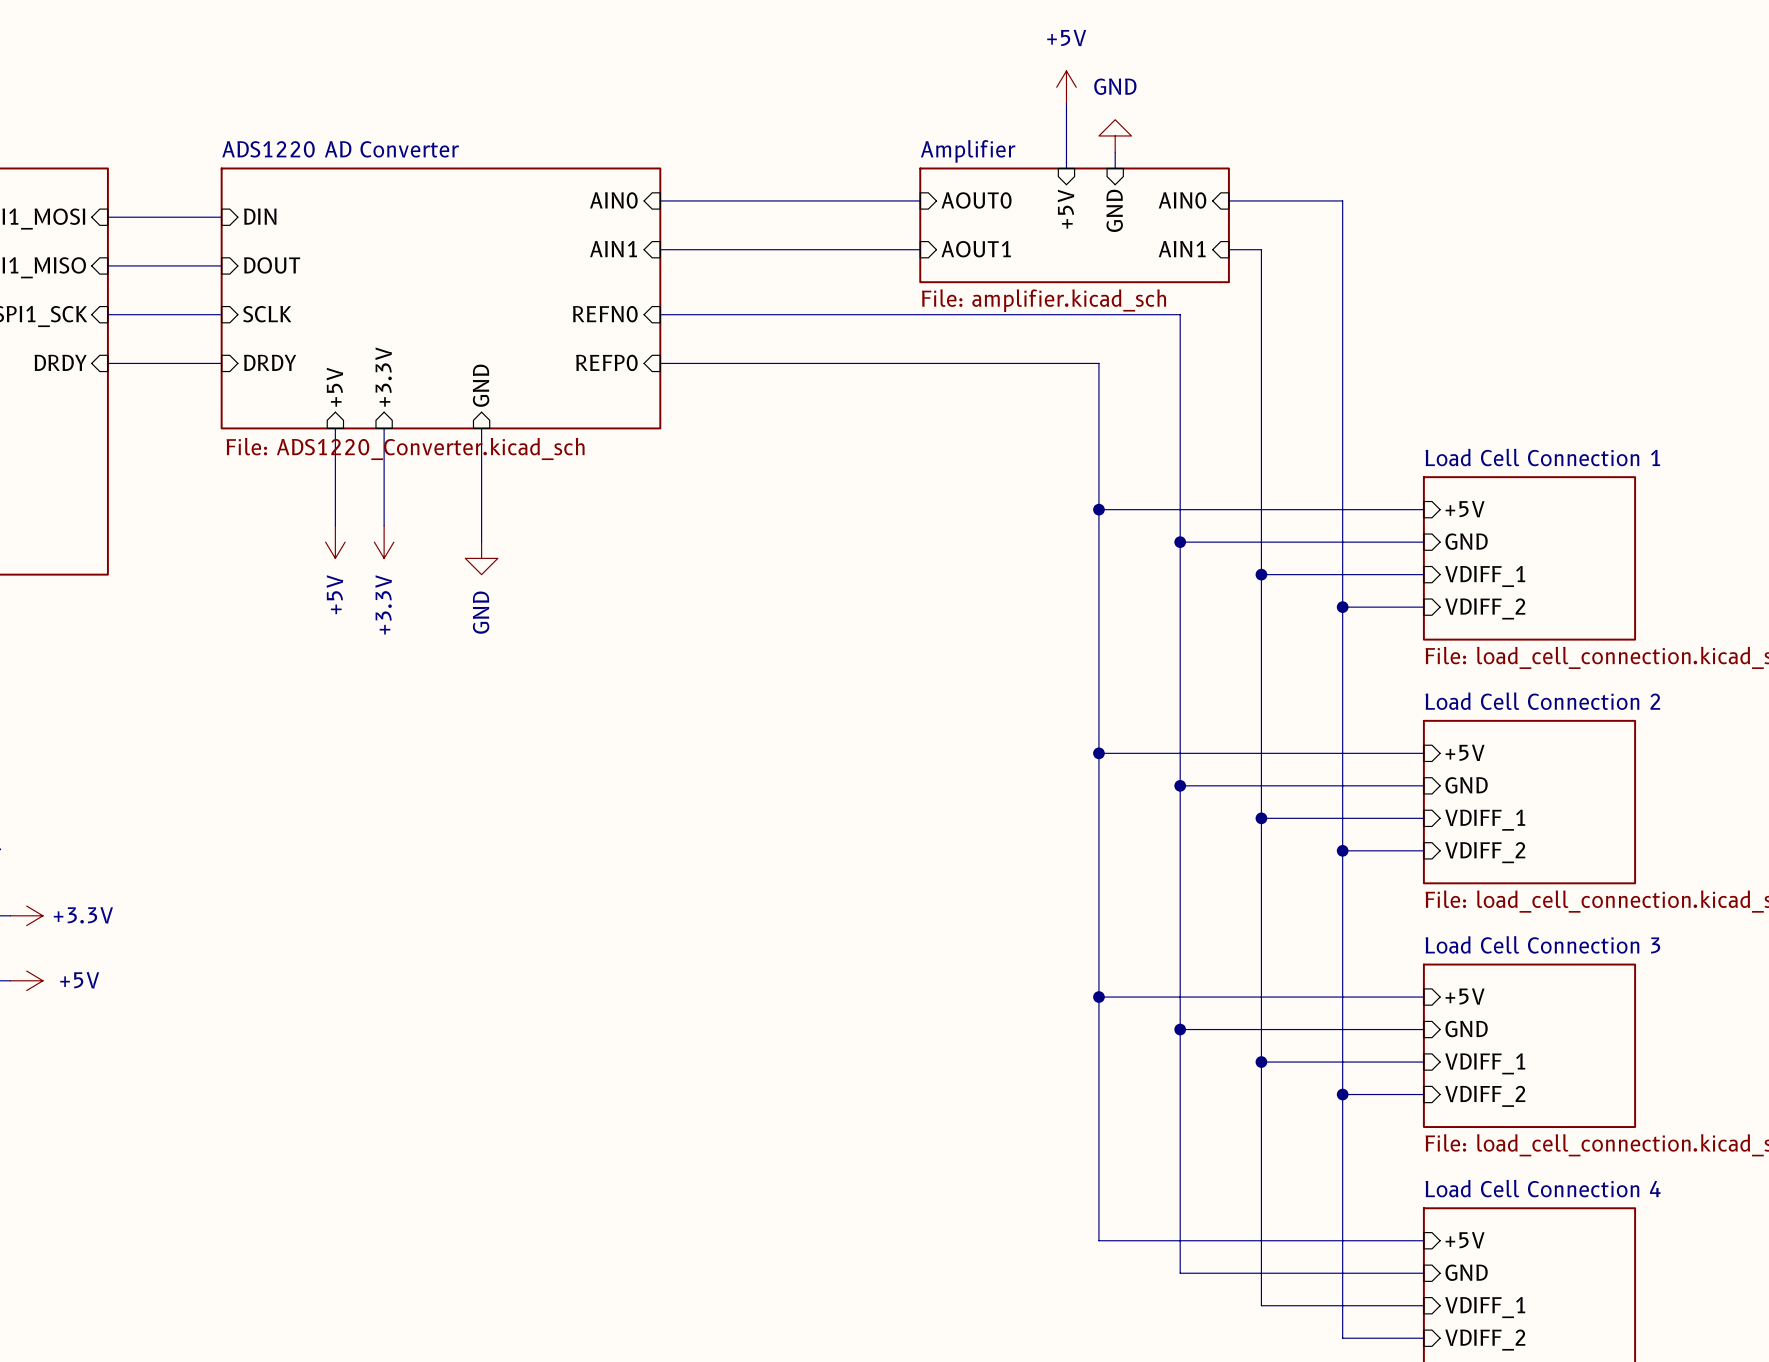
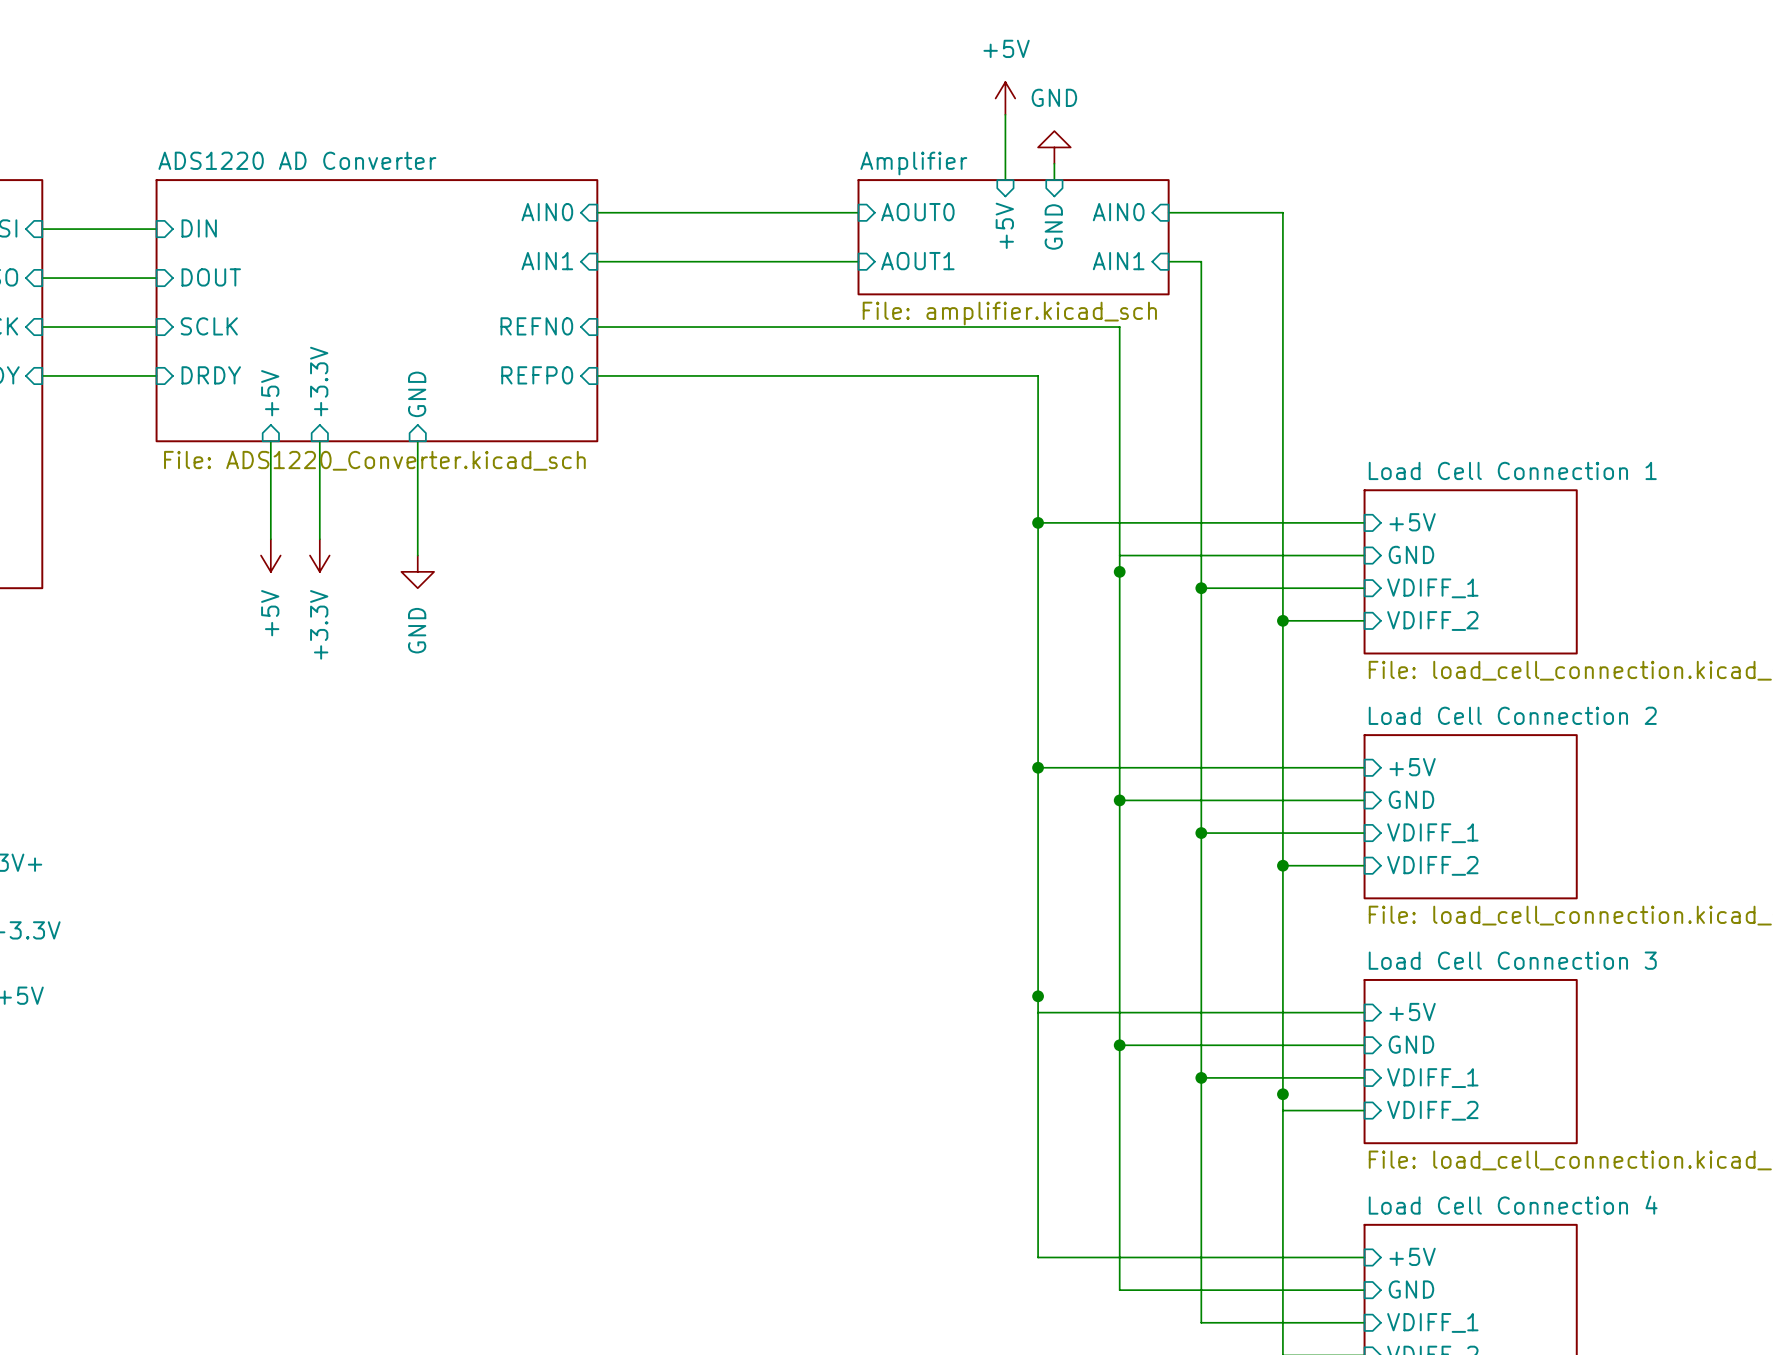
junction position: (1180, 542) -> (1119, 571)
junction position: (1098, 997) -> (1038, 996)
junction position: (1342, 1094) -> (1282, 1094)

